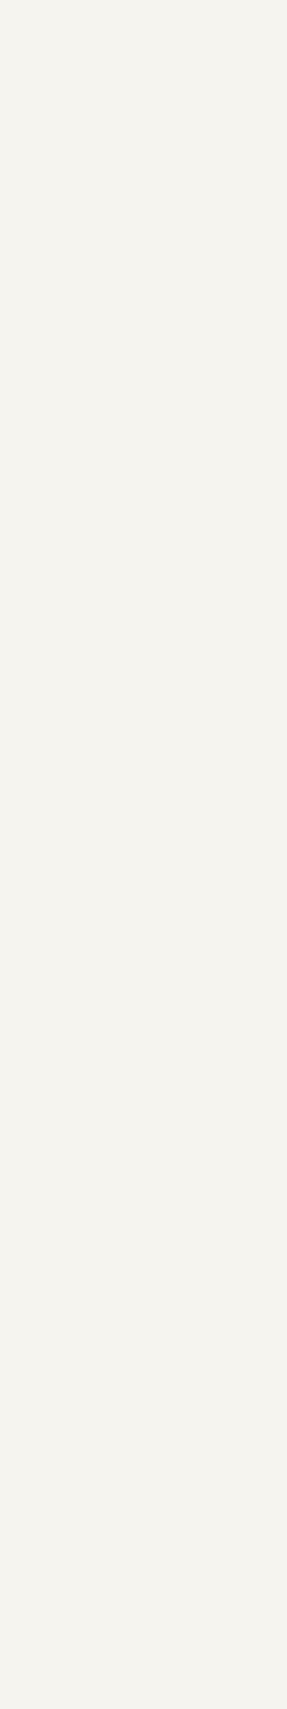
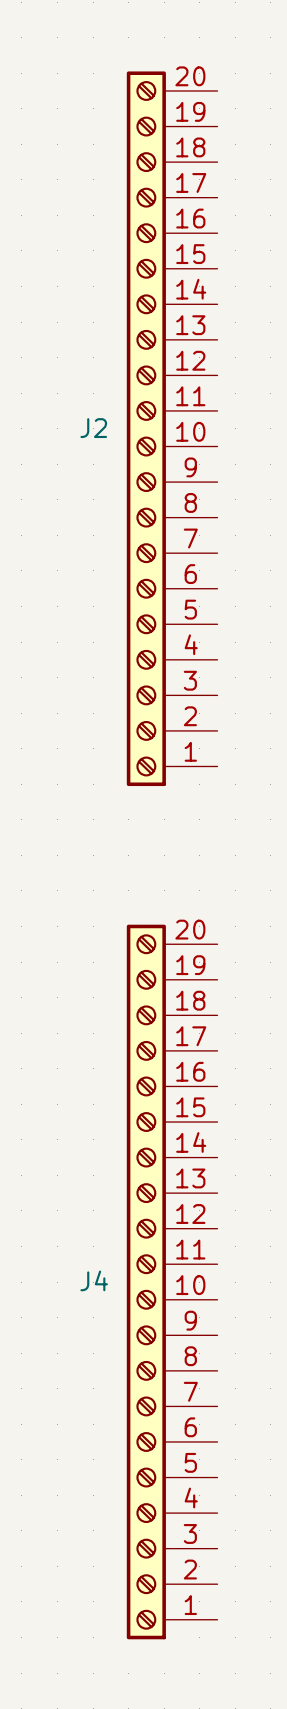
J2: none -> (172, 428)
J4: none -> (172, 1282)

